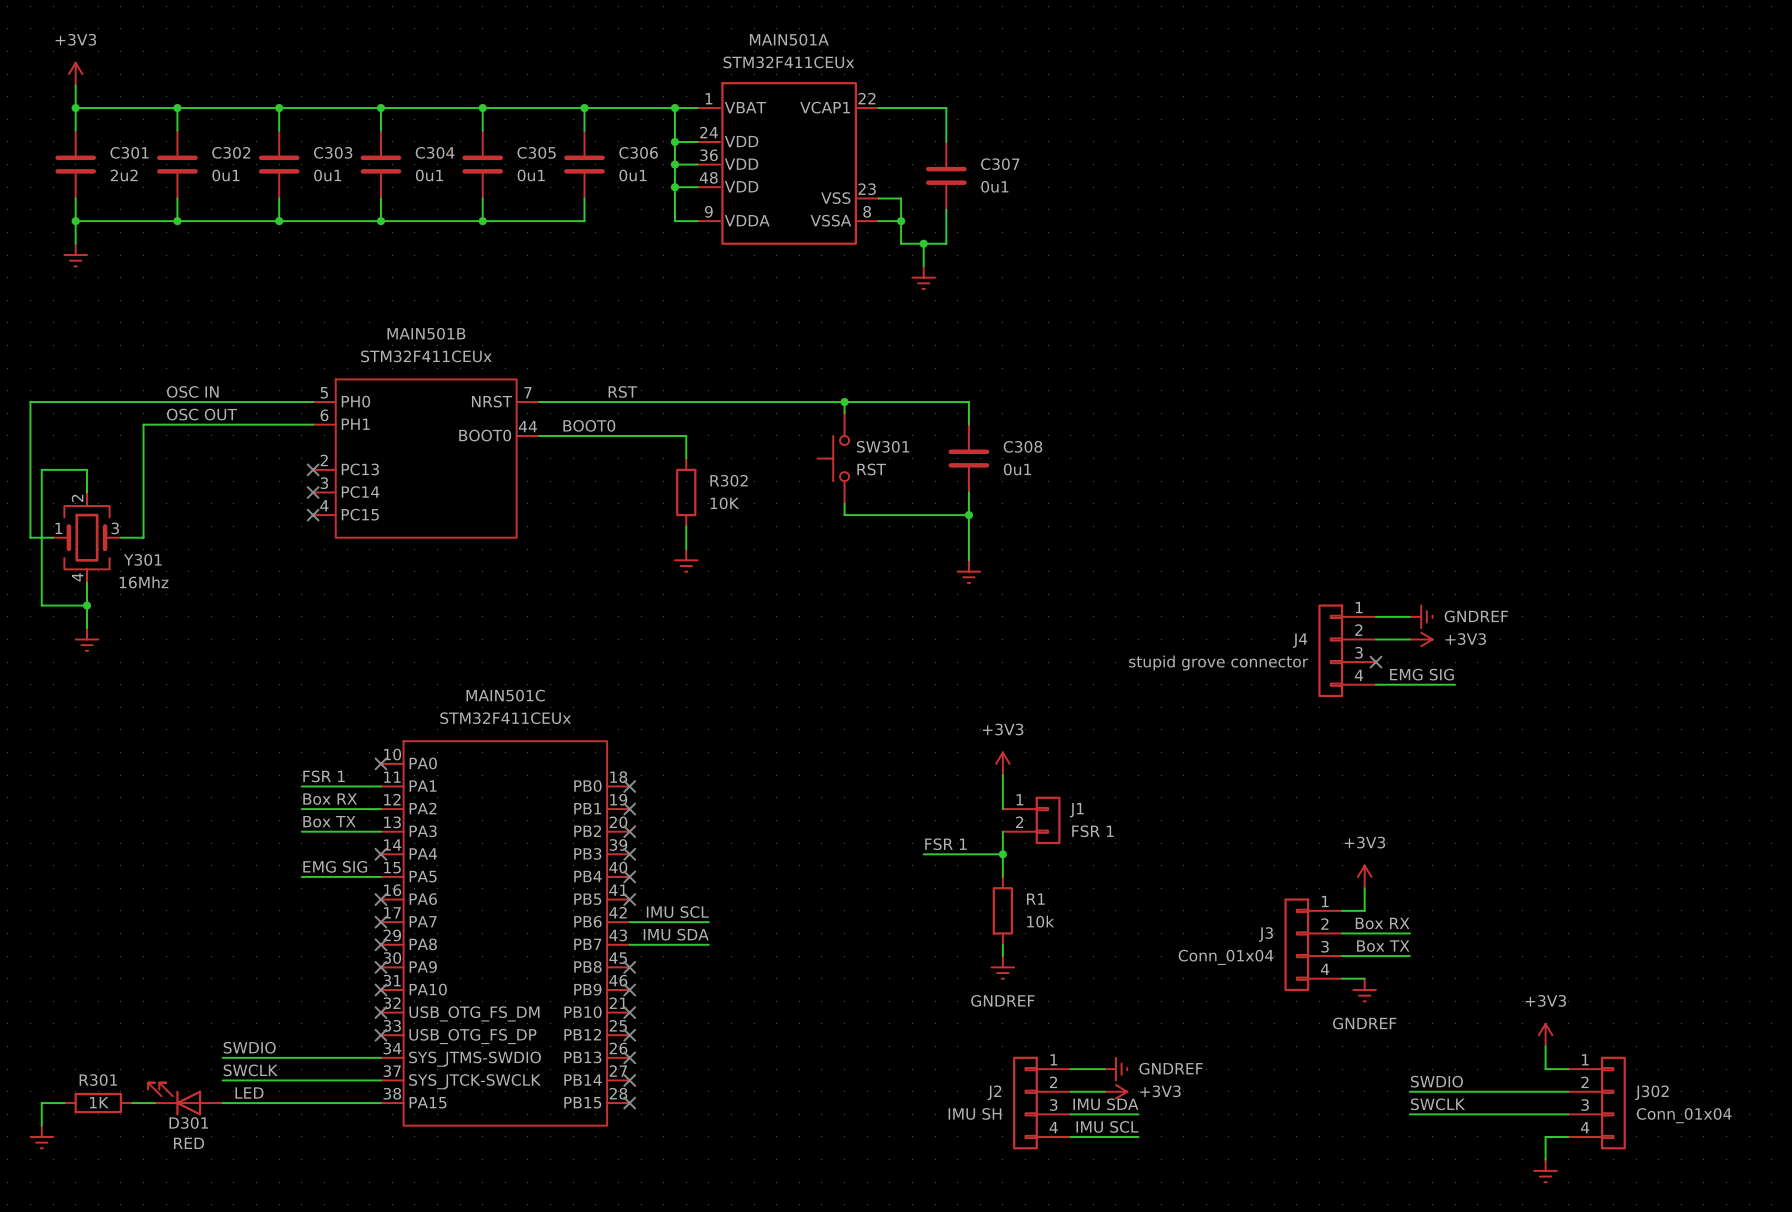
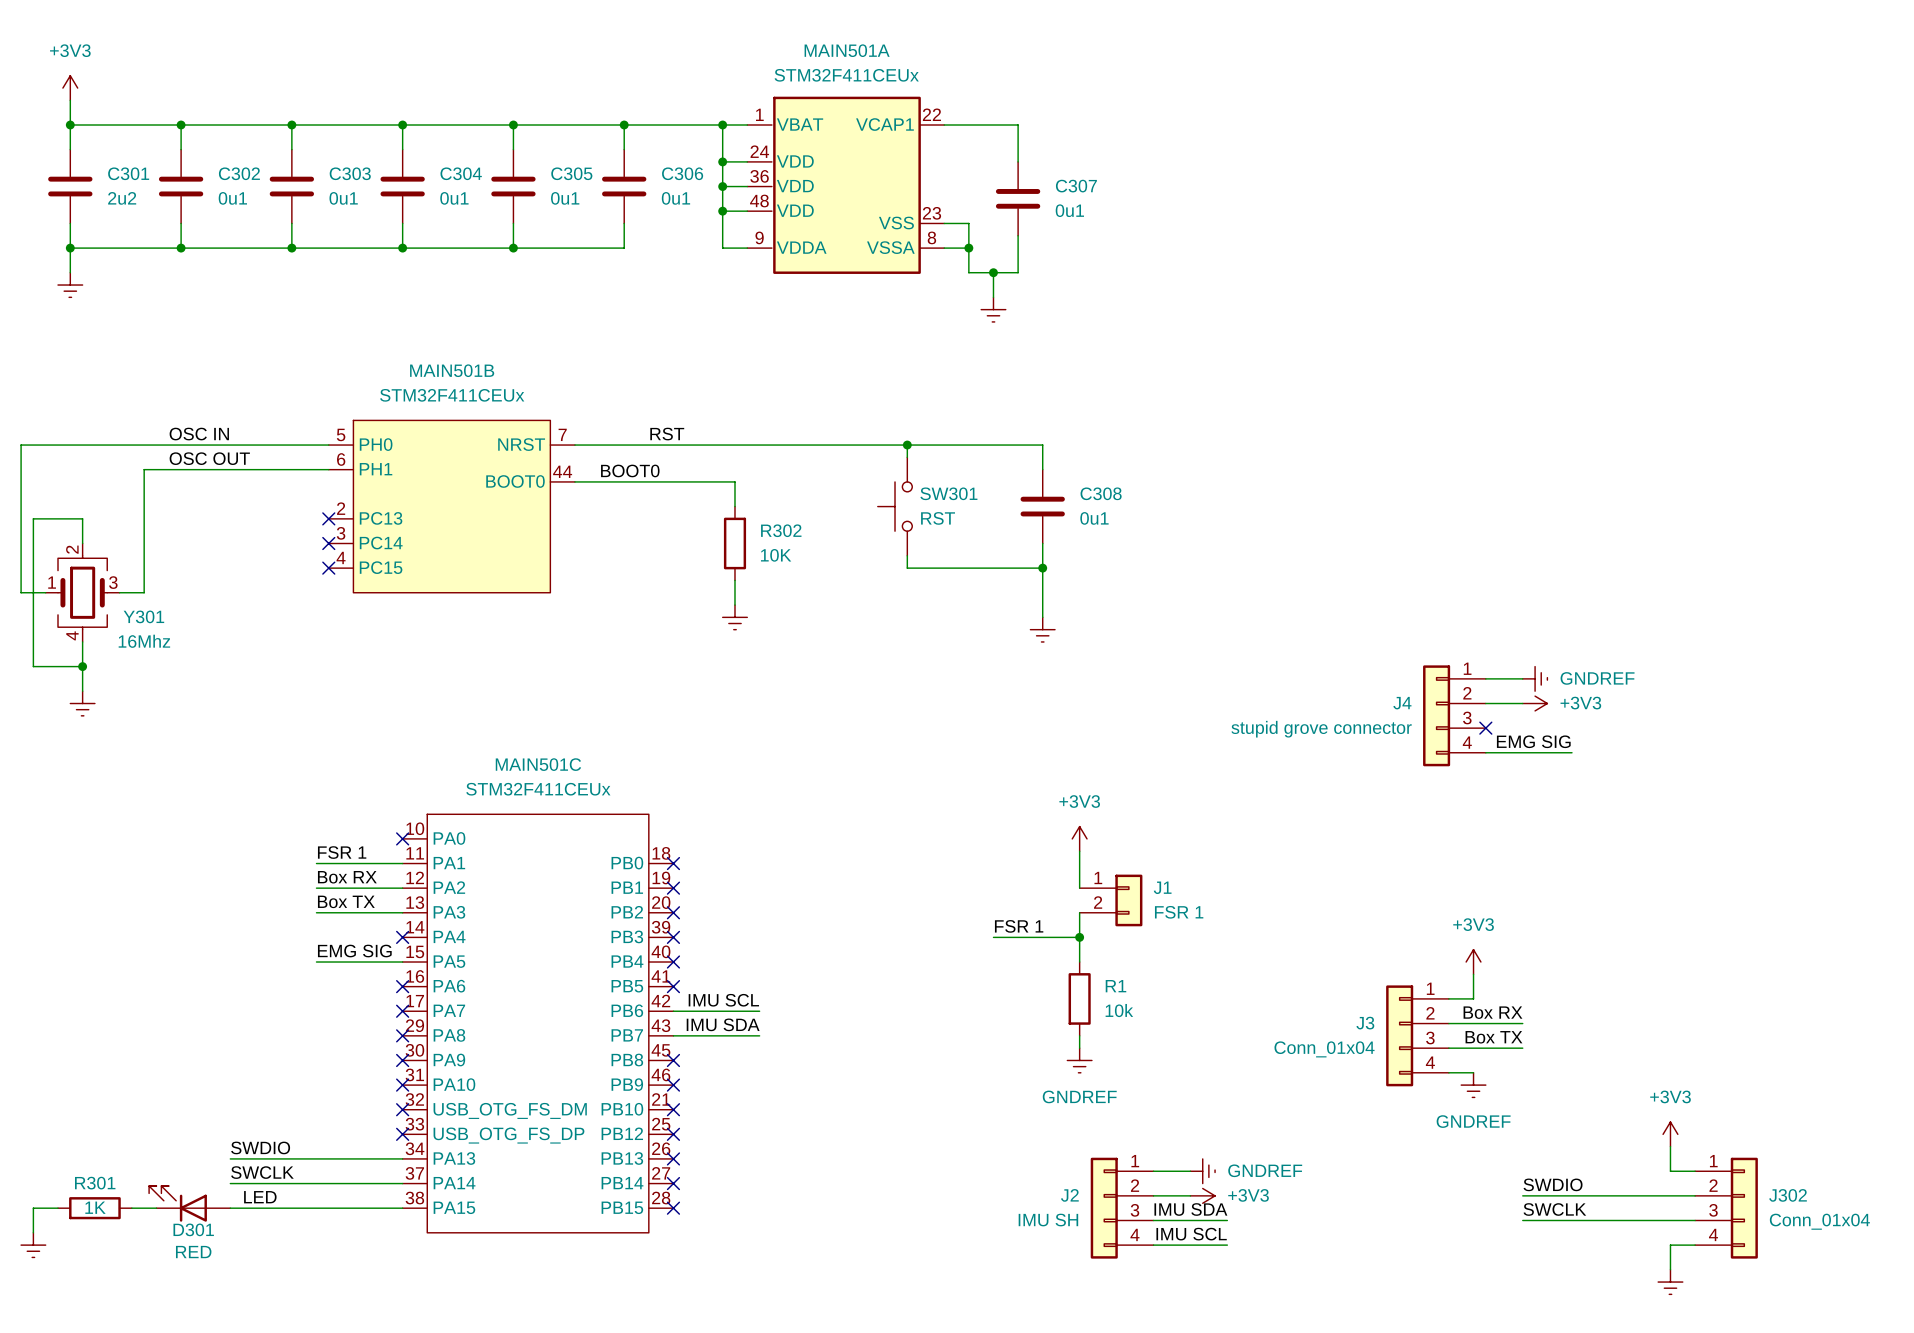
MAIN501C pin name: SYS_JTMS-SWDIO (475, 1059) -> PA13 (454, 1158)
MAIN501C pin name: SYS_JTCK-SWCLK (474, 1081) -> PA14 (454, 1183)

